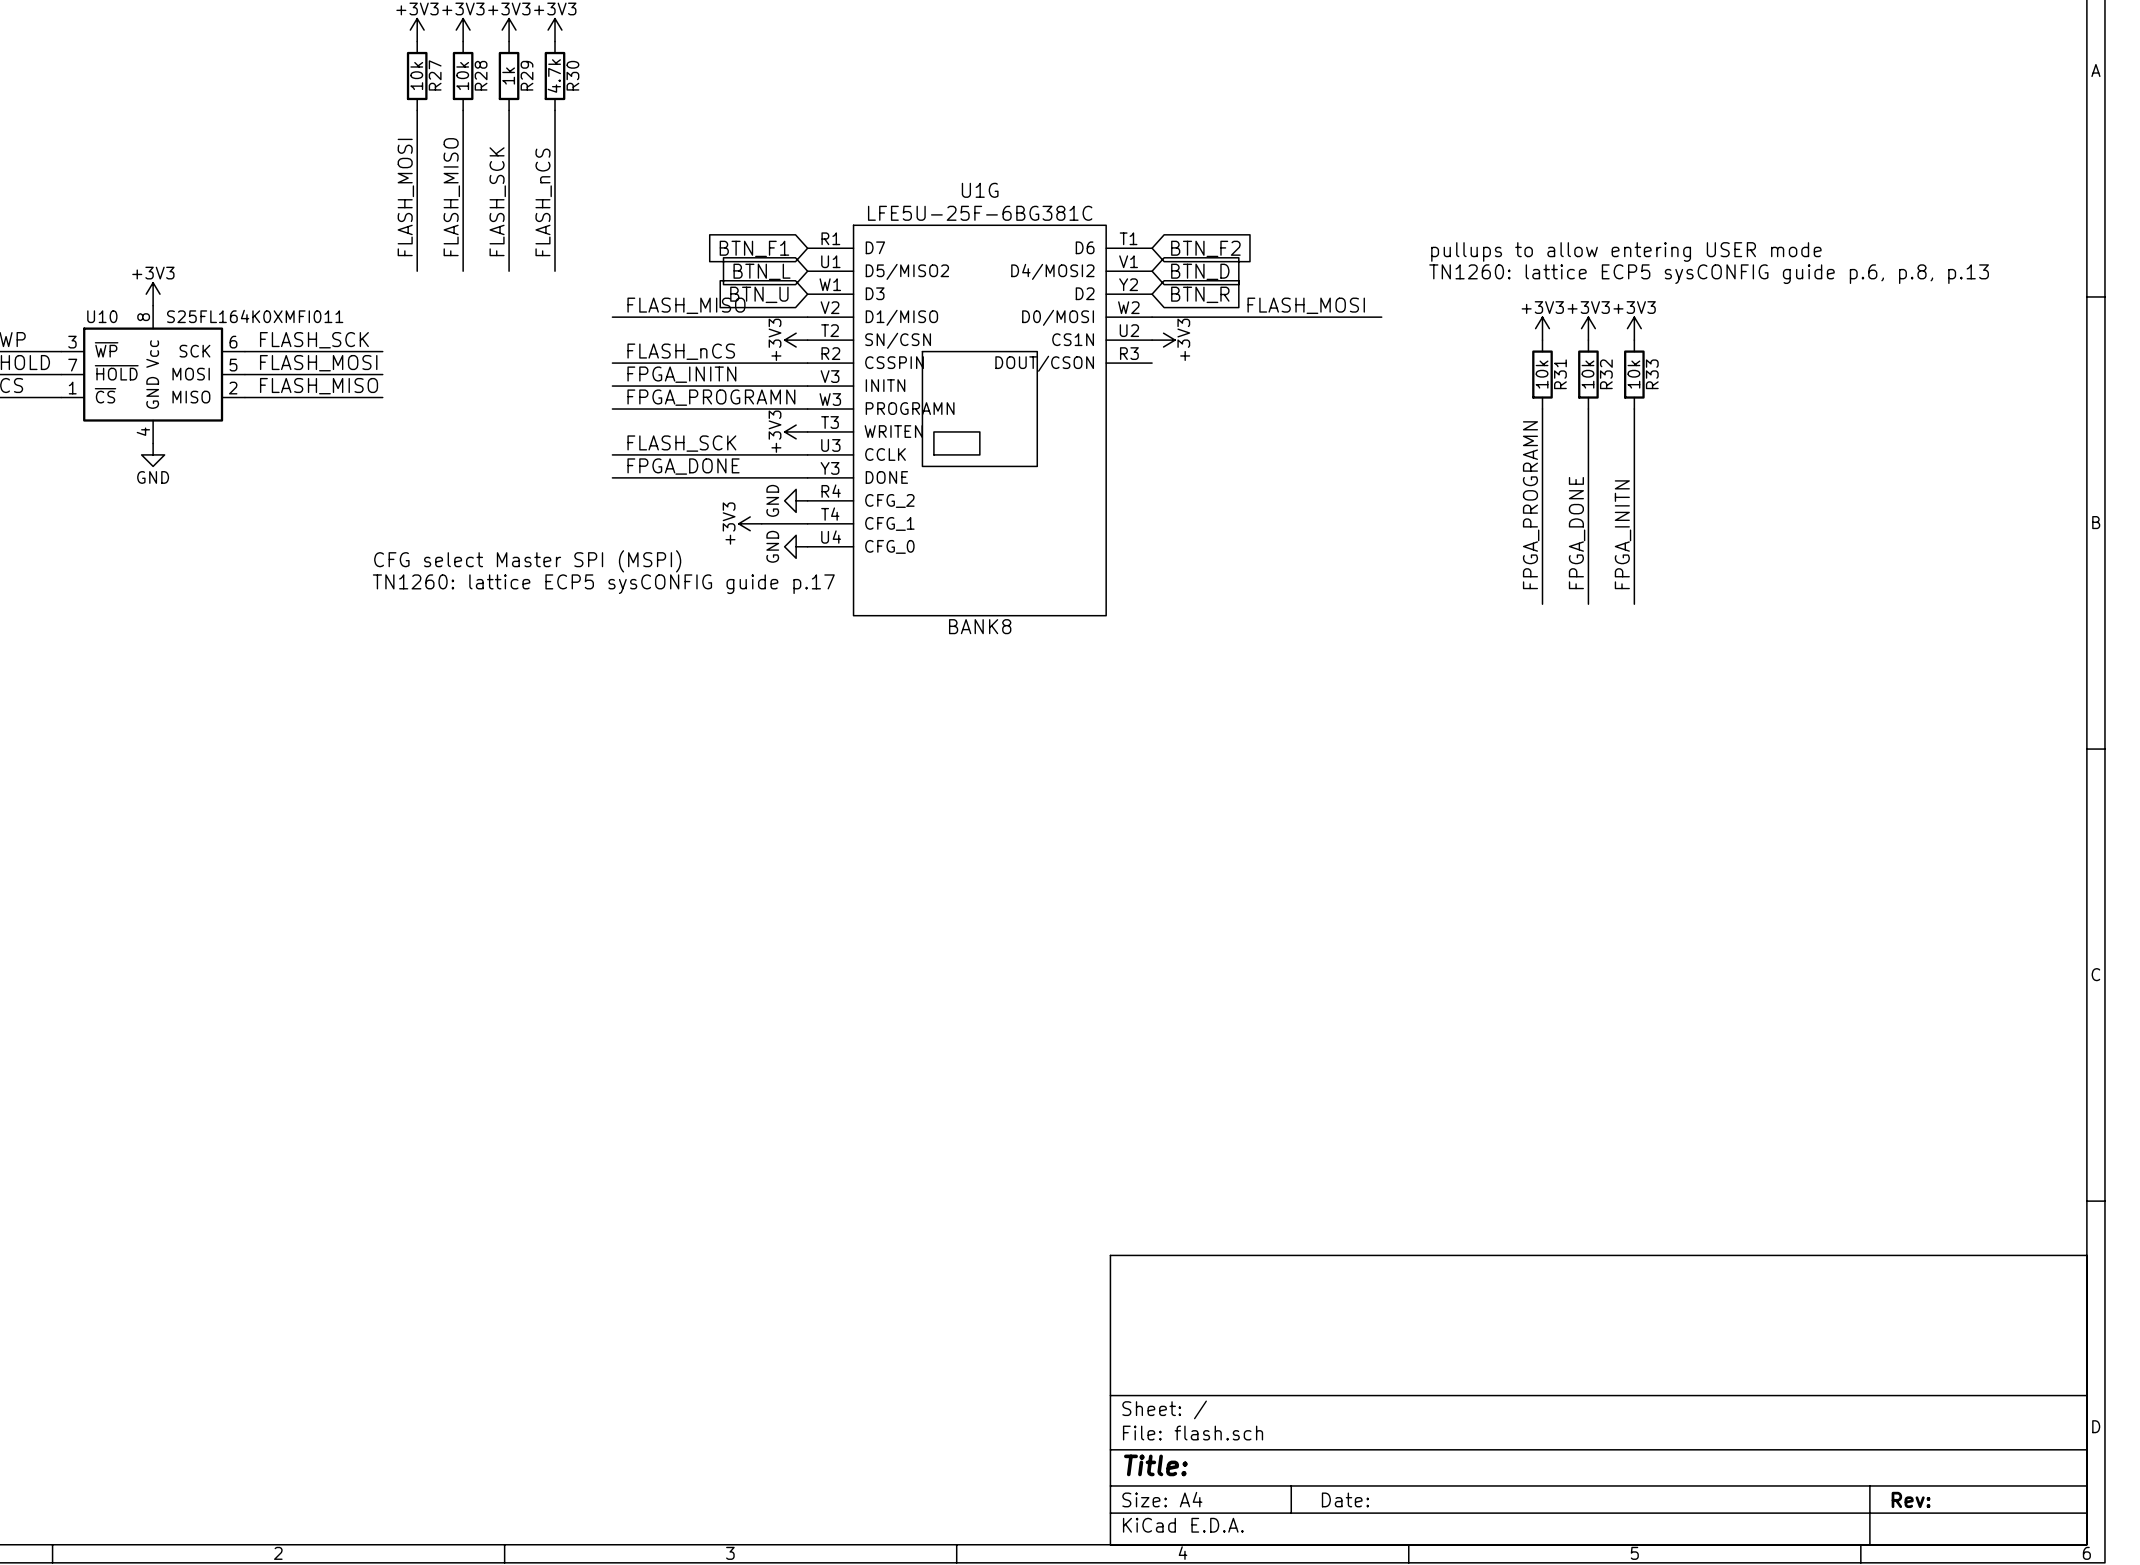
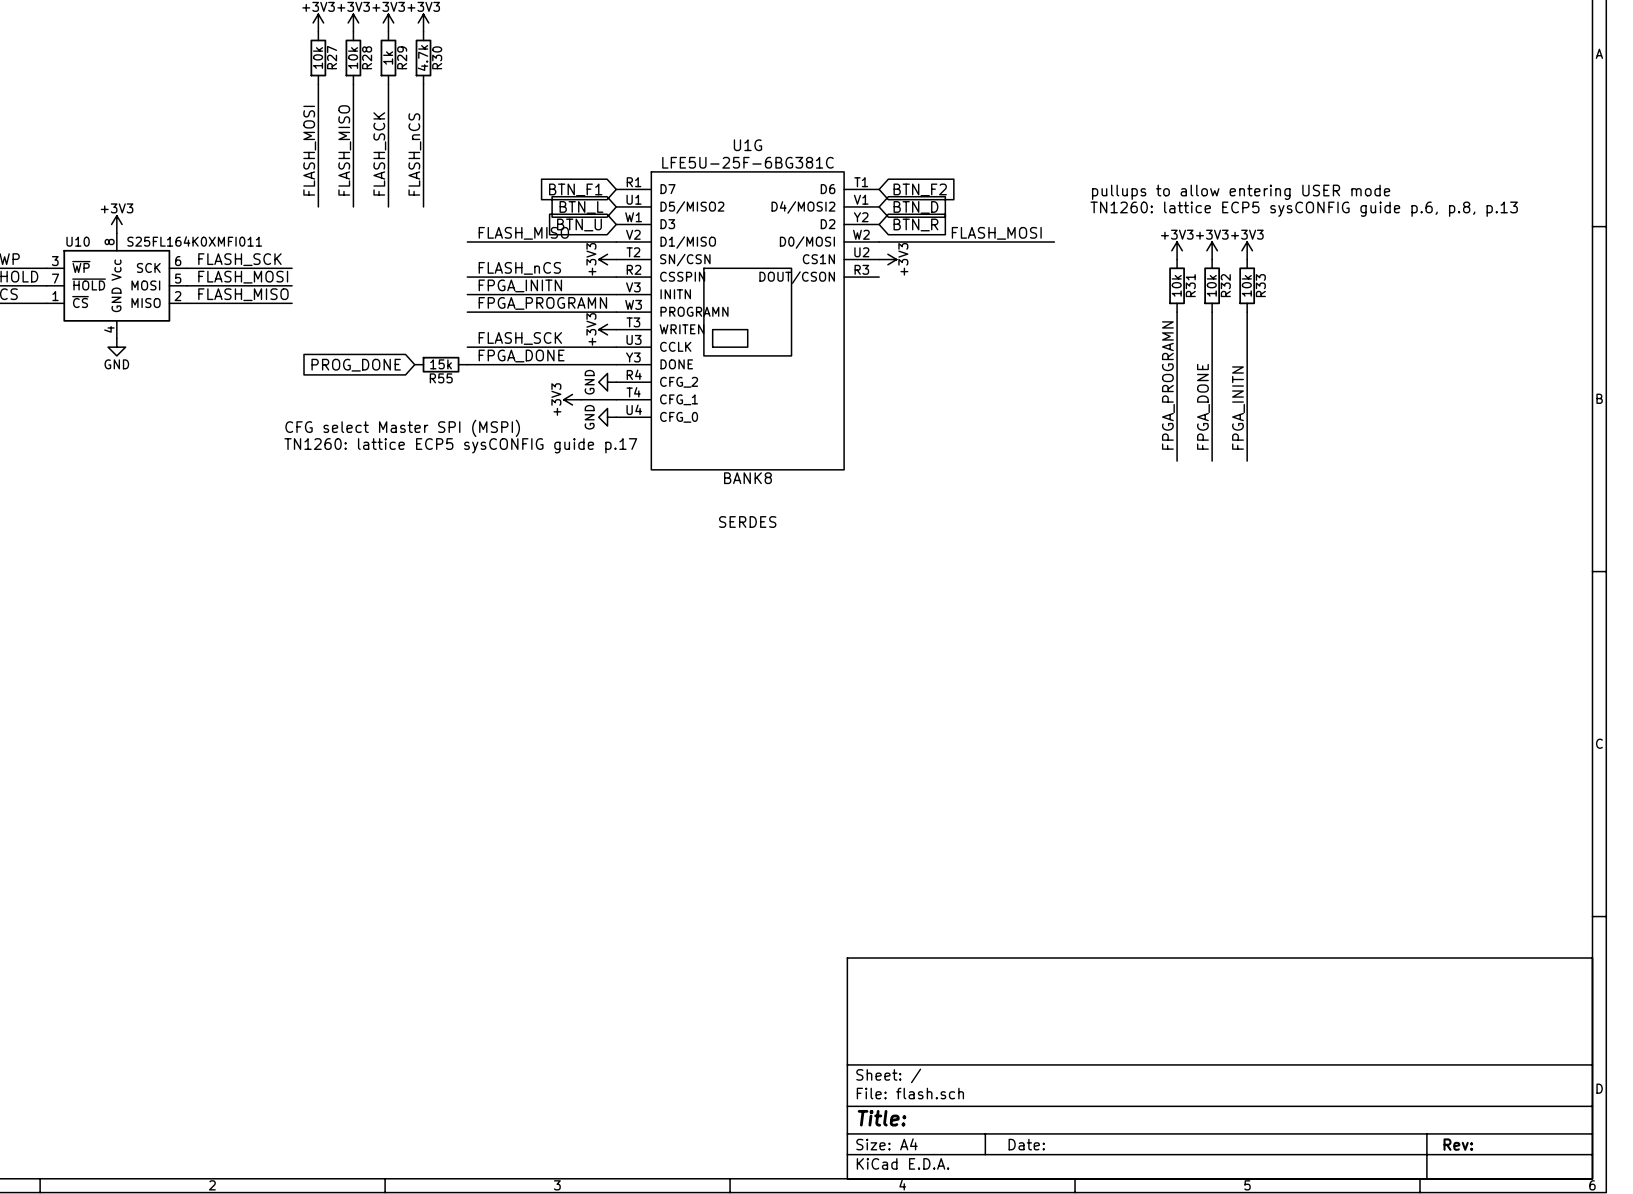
R55: none -> 15k (441, 364)
global label: none -> PROG_DONE (356, 365)
U1G text: none -> SERDES (747, 522)

